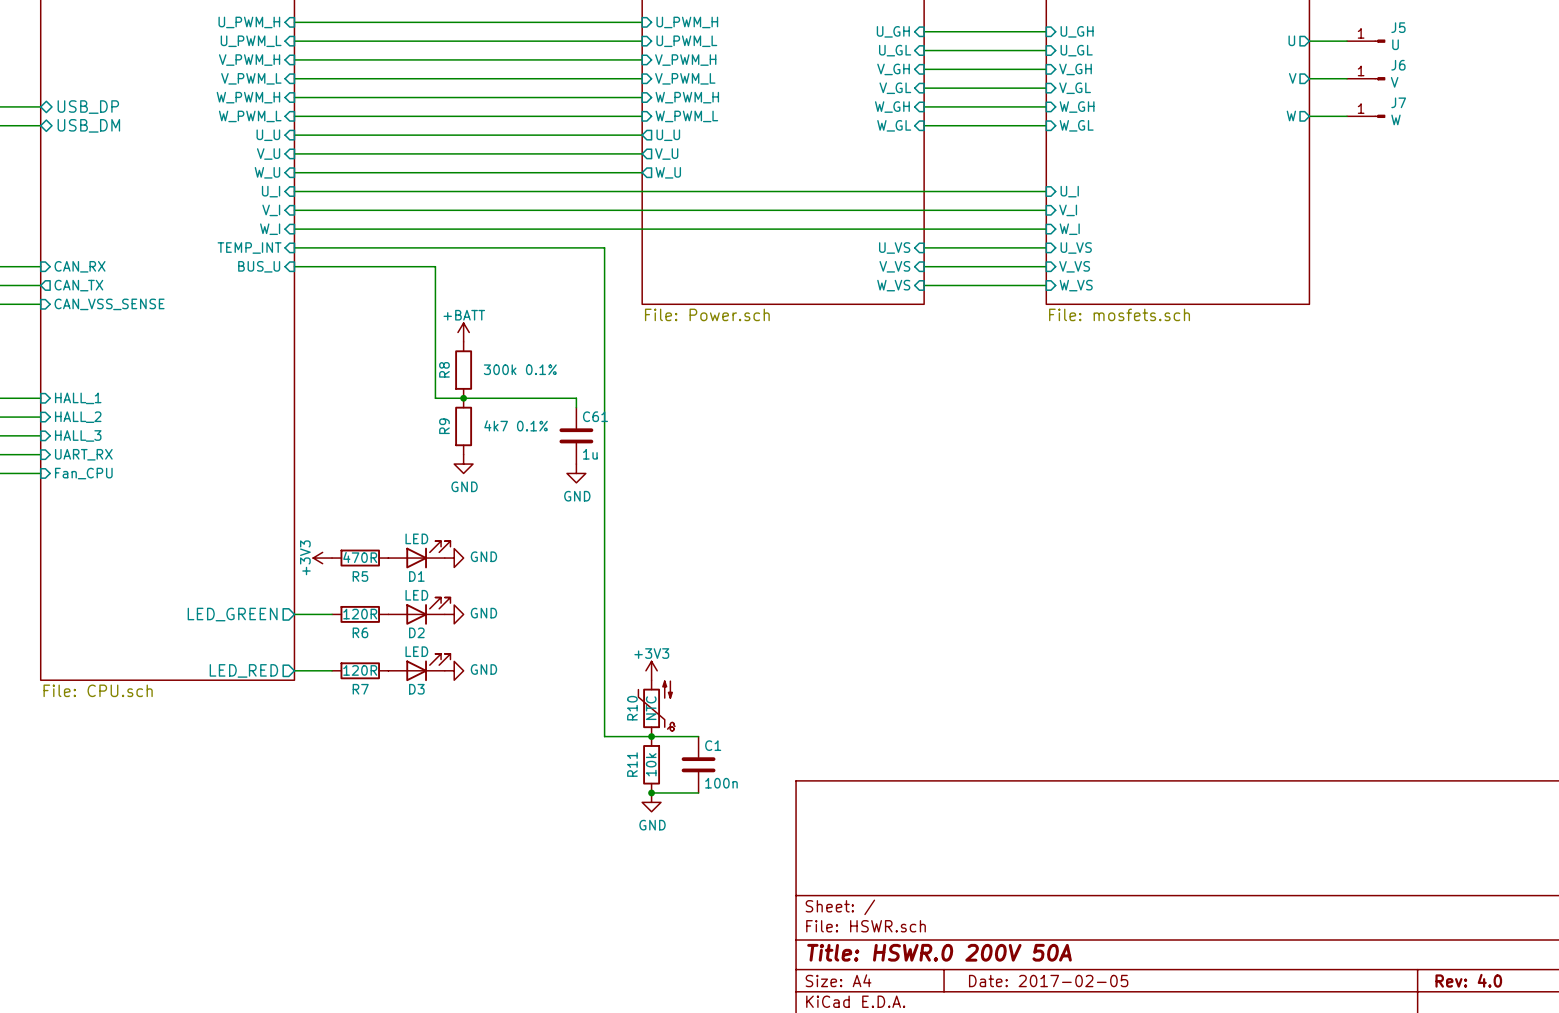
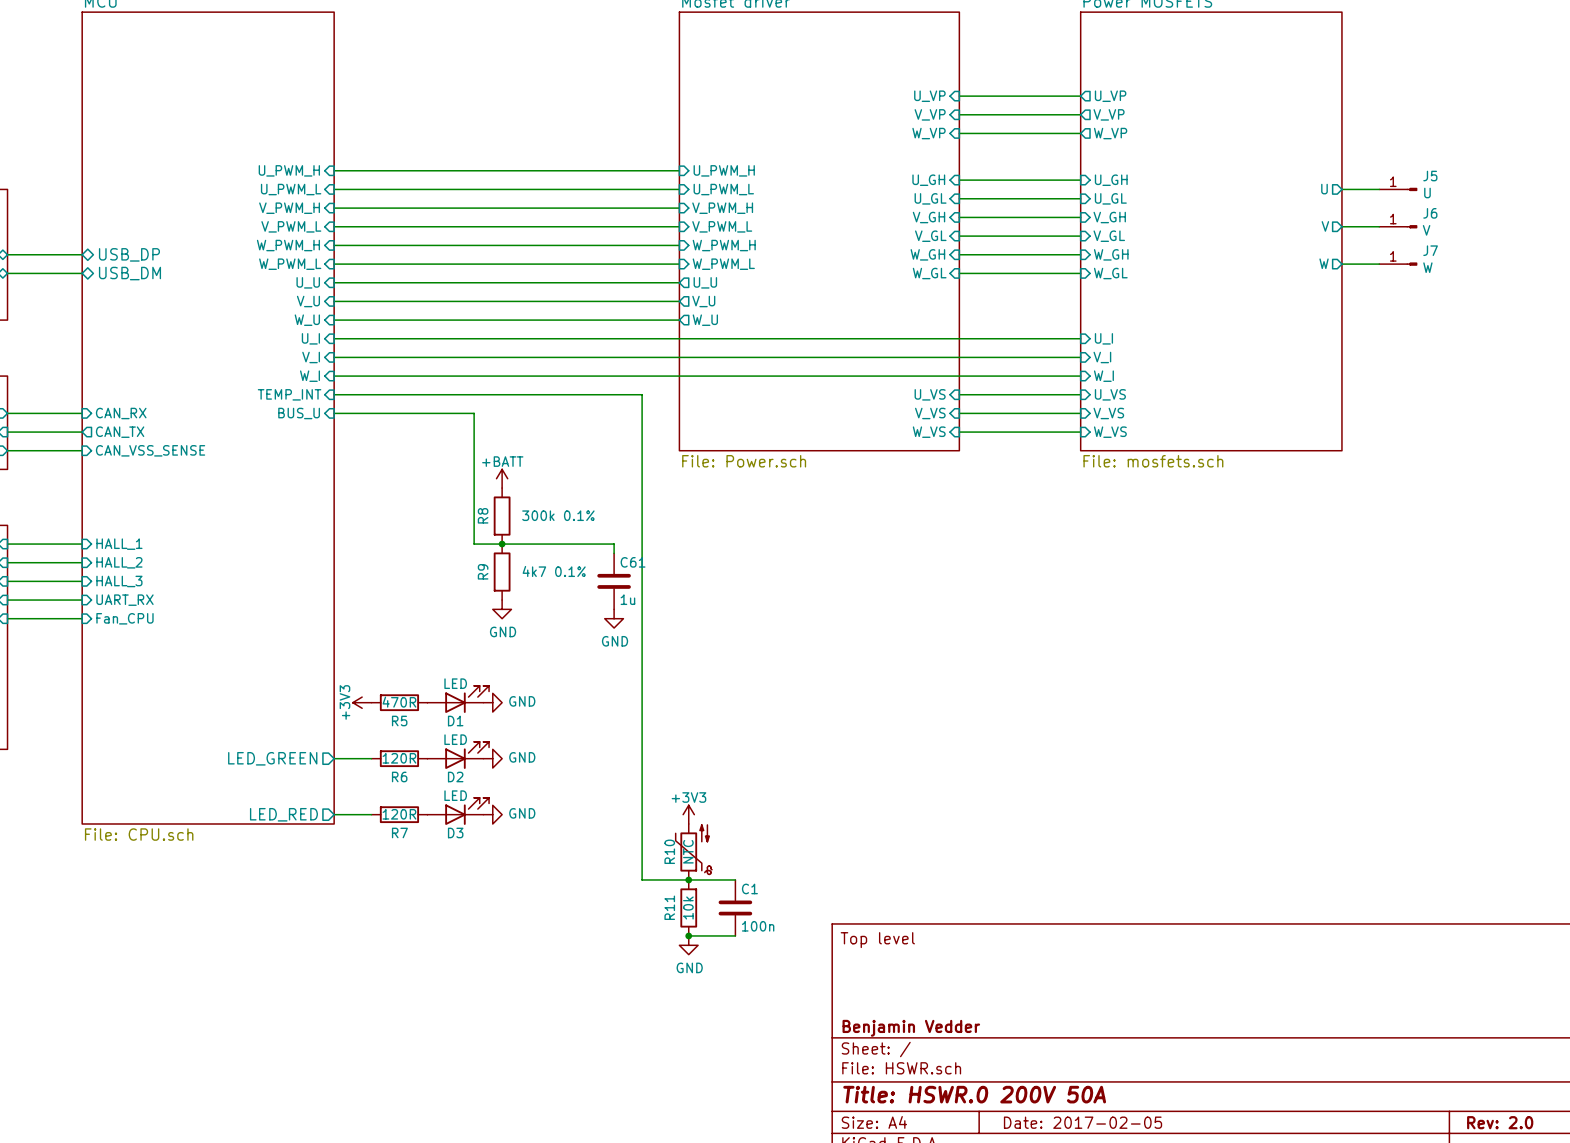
title block: none -> Top level (877, 940)
title block: none -> Benjamin Vedder (911, 1028)
title block: Rev: 4.0 (1468, 980) -> Rev: 2.0 (1500, 1122)

